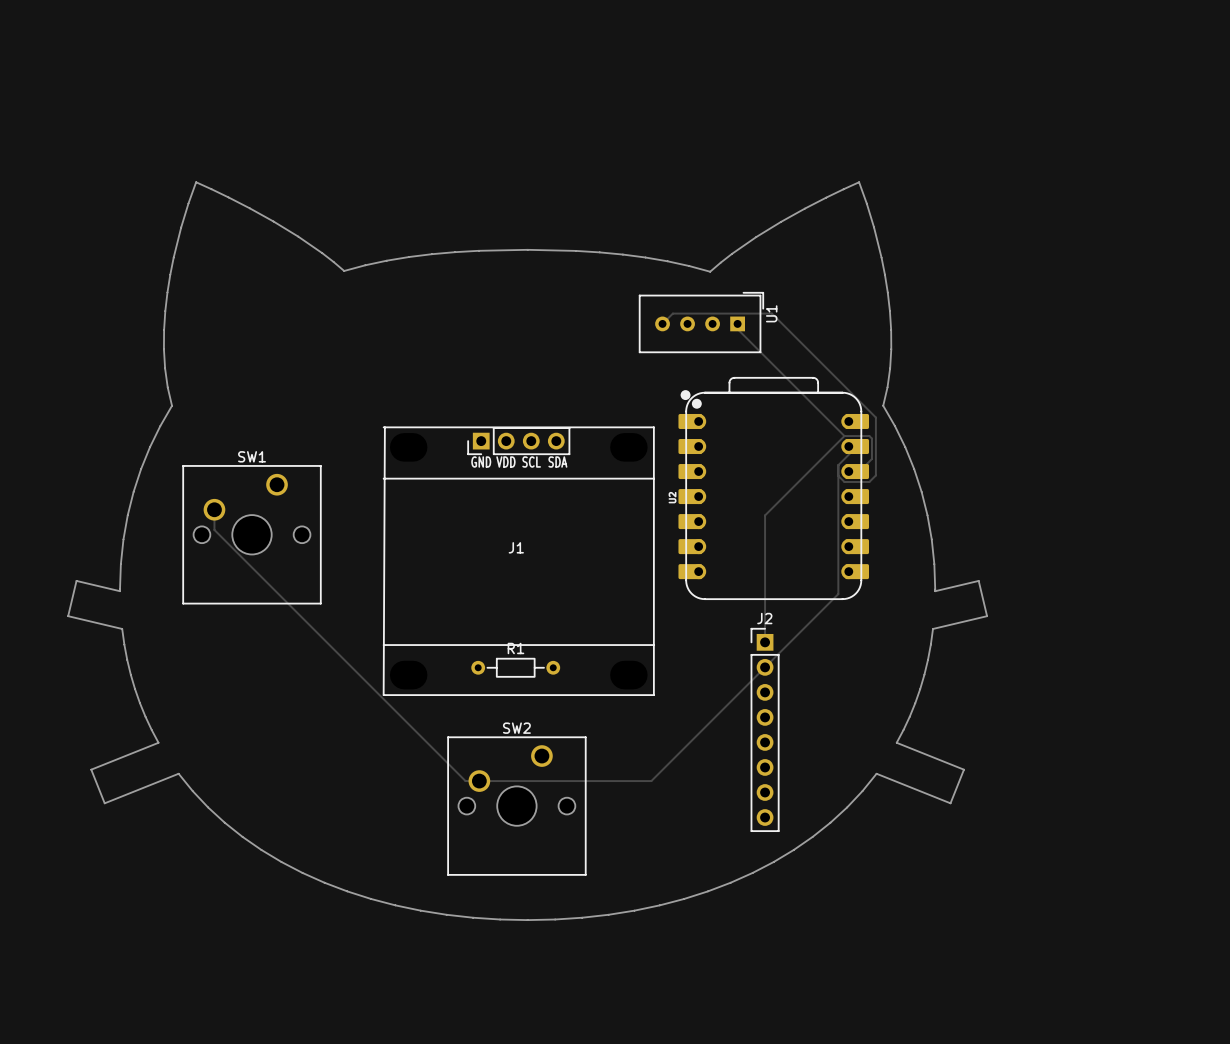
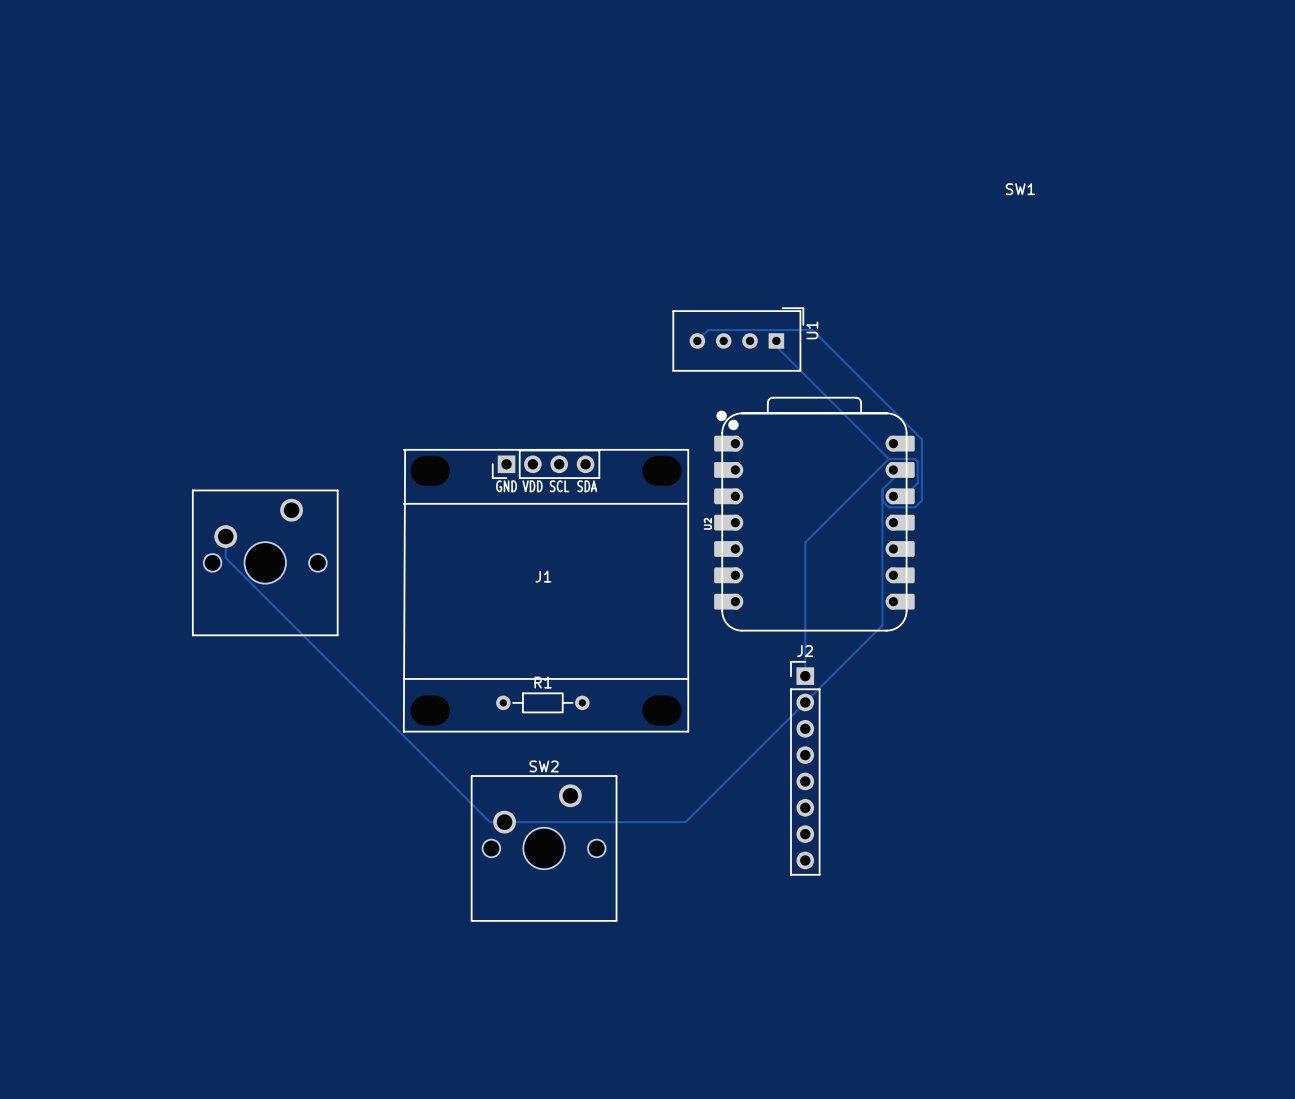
board edge: (196, 182) (173, 257) (165, 311) (165, 368) (172, 405) (149, 447) (133, 491) (123, 539) (120, 591) (76, 580) (68, 616) (122, 628) (127, 659) (135, 689) (158, 742) (91, 769) (104, 803) (178, 773) (208, 807) (242, 836) (281, 861) (324, 882) (371, 898) (420, 910) (473, 917) (527, 920) (582, 917) (634, 910) (684, 898) (730, 882) (773, 861) (812, 836) (847, 807) (876, 773) (950, 803) (963, 769) (896, 742) (920, 689) (927, 659) (933, 628) (987, 616) (978, 580) (935, 591) (931, 539) (921, 491) (905, 447) (883, 405) (890, 368) (889, 311) (881, 257) (859, 182) (781, 221) (732, 253) (710, 271) (667, 261) (622, 254) (527, 249) (431, 254) (386, 260) (344, 270) (322, 253) (273, 221) (196, 182) -> none
SW1 name position: SW1 (252, 456) -> SW1 (1020, 189)

